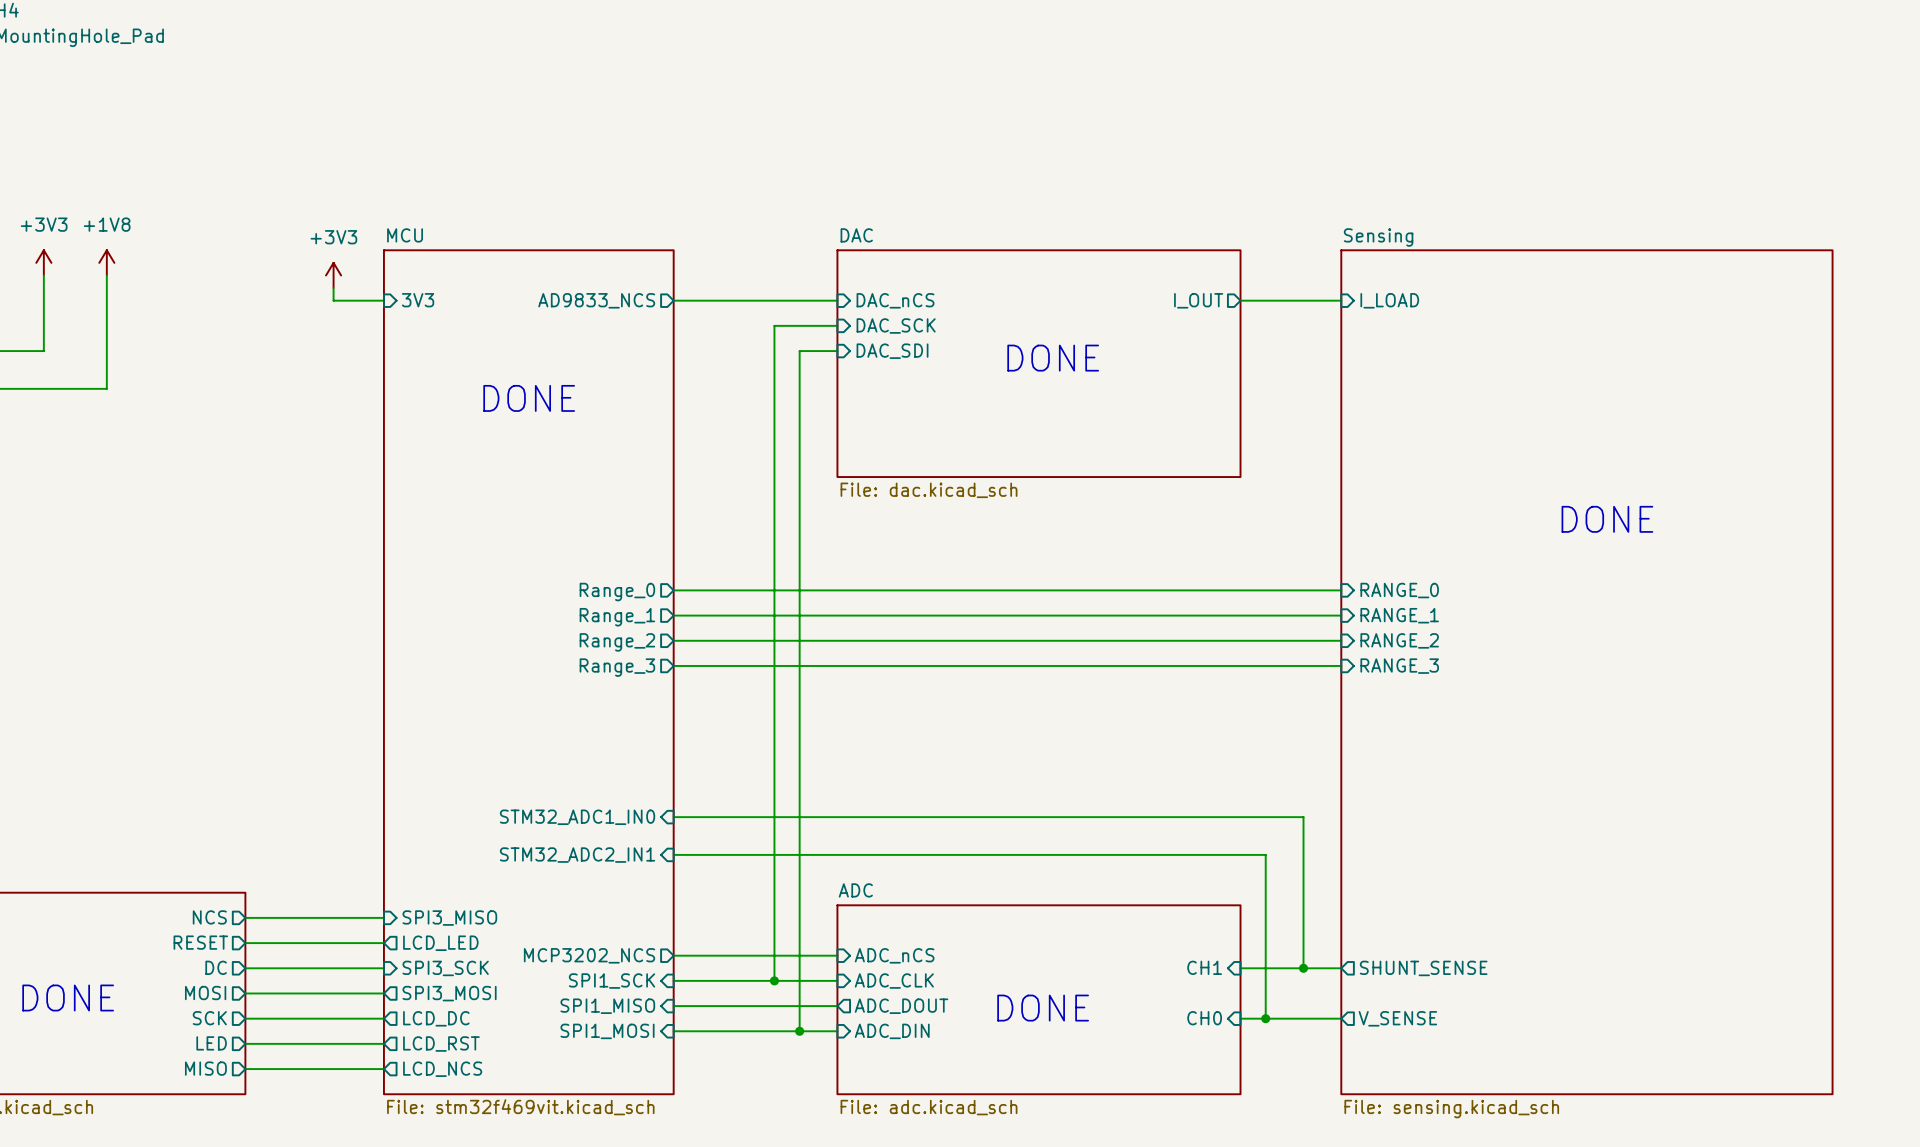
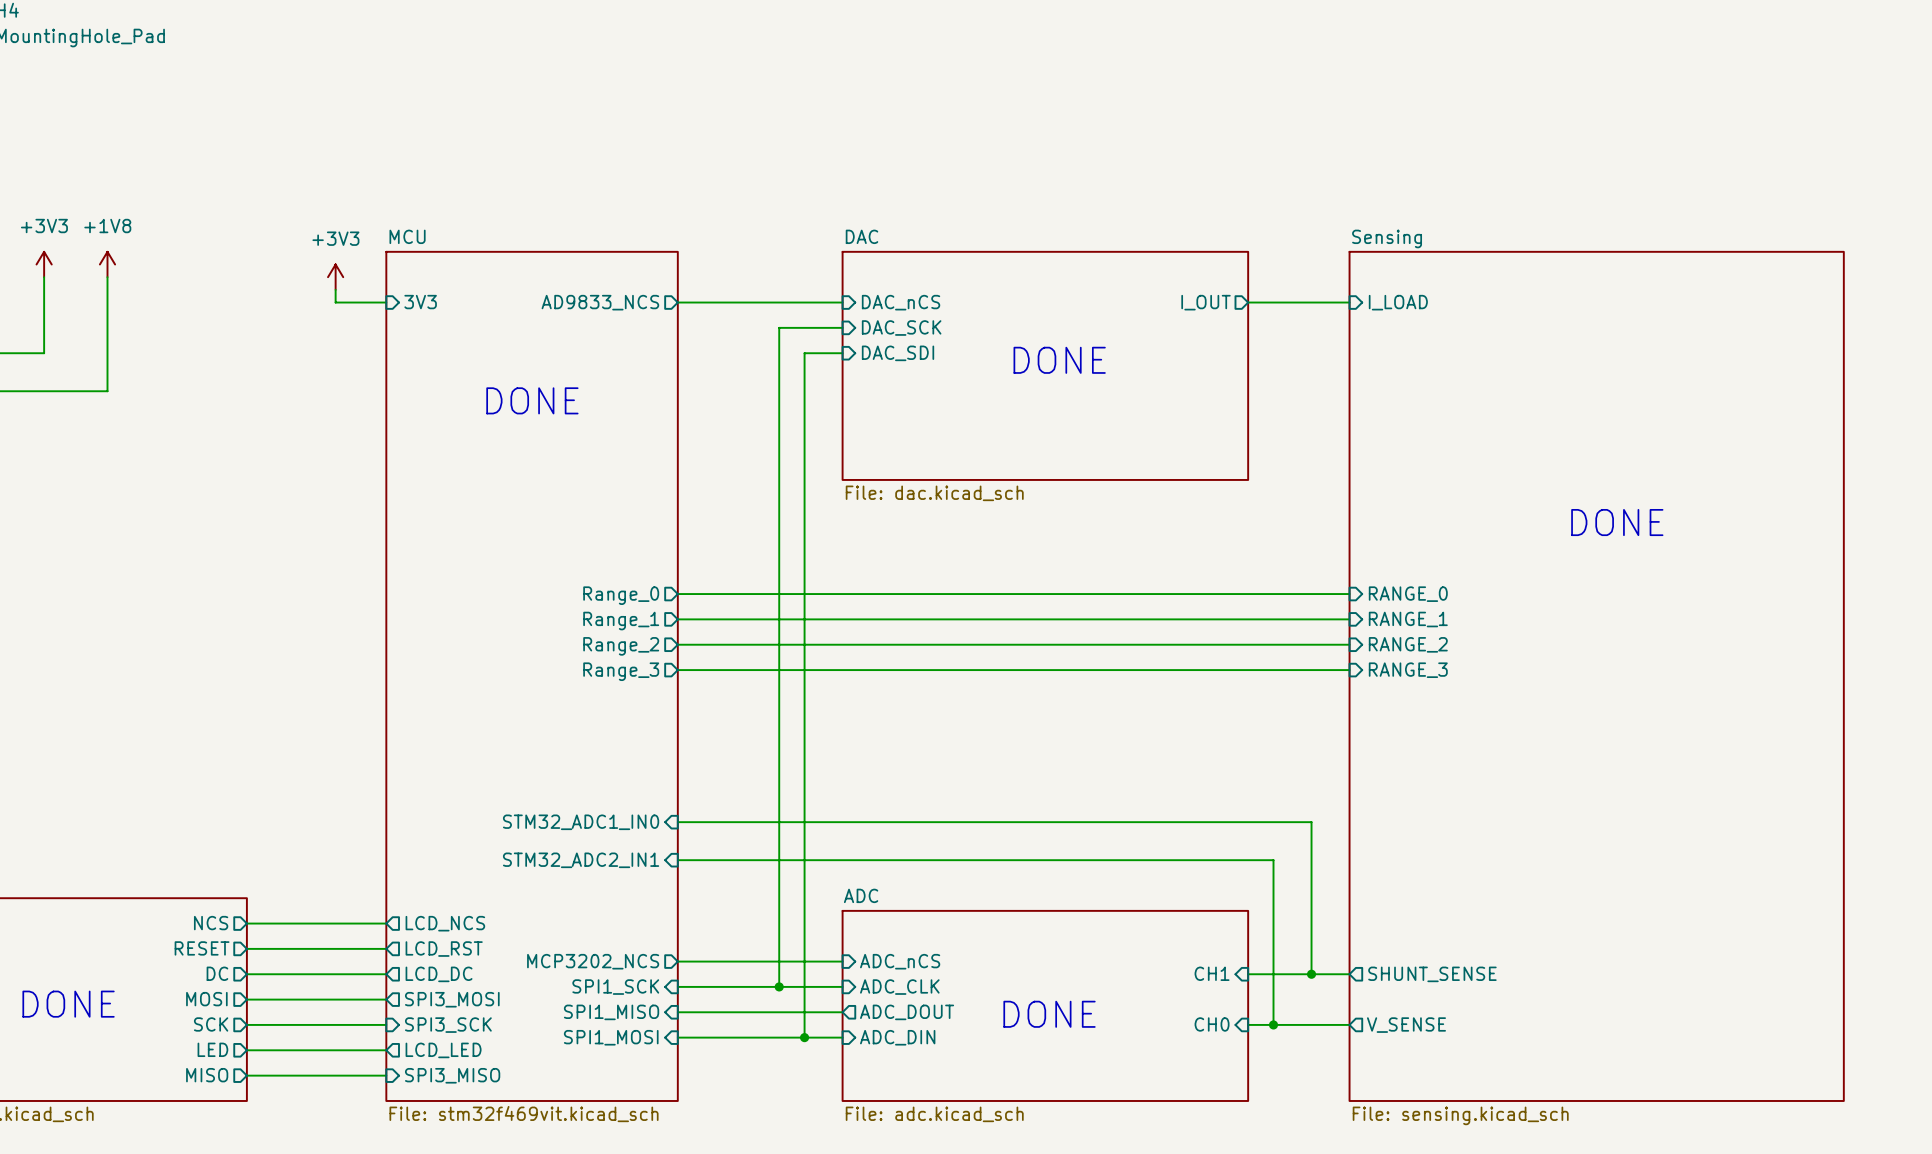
sheet pin shape: input (449, 918) -> output (445, 923)
sheet pin: SPI3_MISO (449, 918) -> LCD_NCS (445, 923)
sheet pin: LCD_LED (440, 943) -> LCD_RST (444, 949)
sheet pin shape: input (445, 968) -> output (439, 974)
sheet pin: SPI3_SCK (445, 968) -> LCD_DC (439, 974)
sheet pin shape: output (436, 1018) -> input (448, 1025)
sheet pin: LCD_DC (436, 1018) -> SPI3_SCK (448, 1025)
sheet pin: LCD_RST (441, 1044) -> LCD_LED (443, 1050)
sheet pin shape: output (442, 1069) -> input (452, 1075)
sheet pin: LCD_NCS (442, 1069) -> SPI3_MISO (452, 1075)

